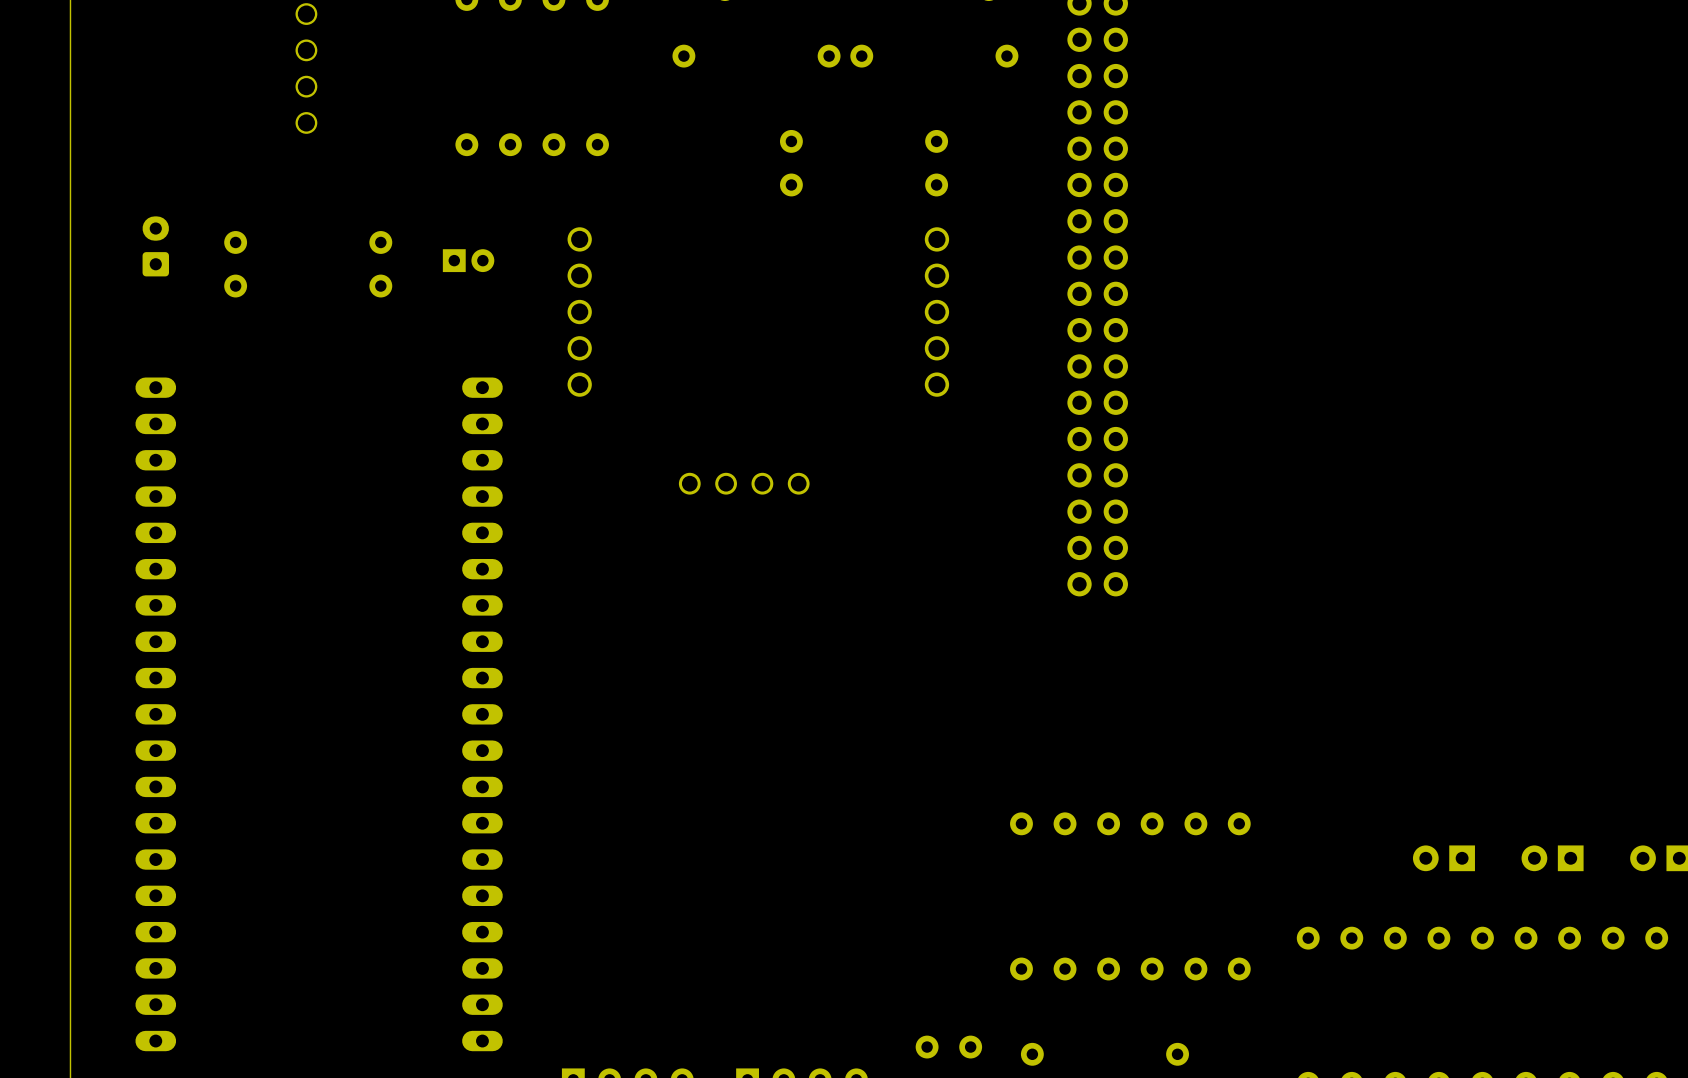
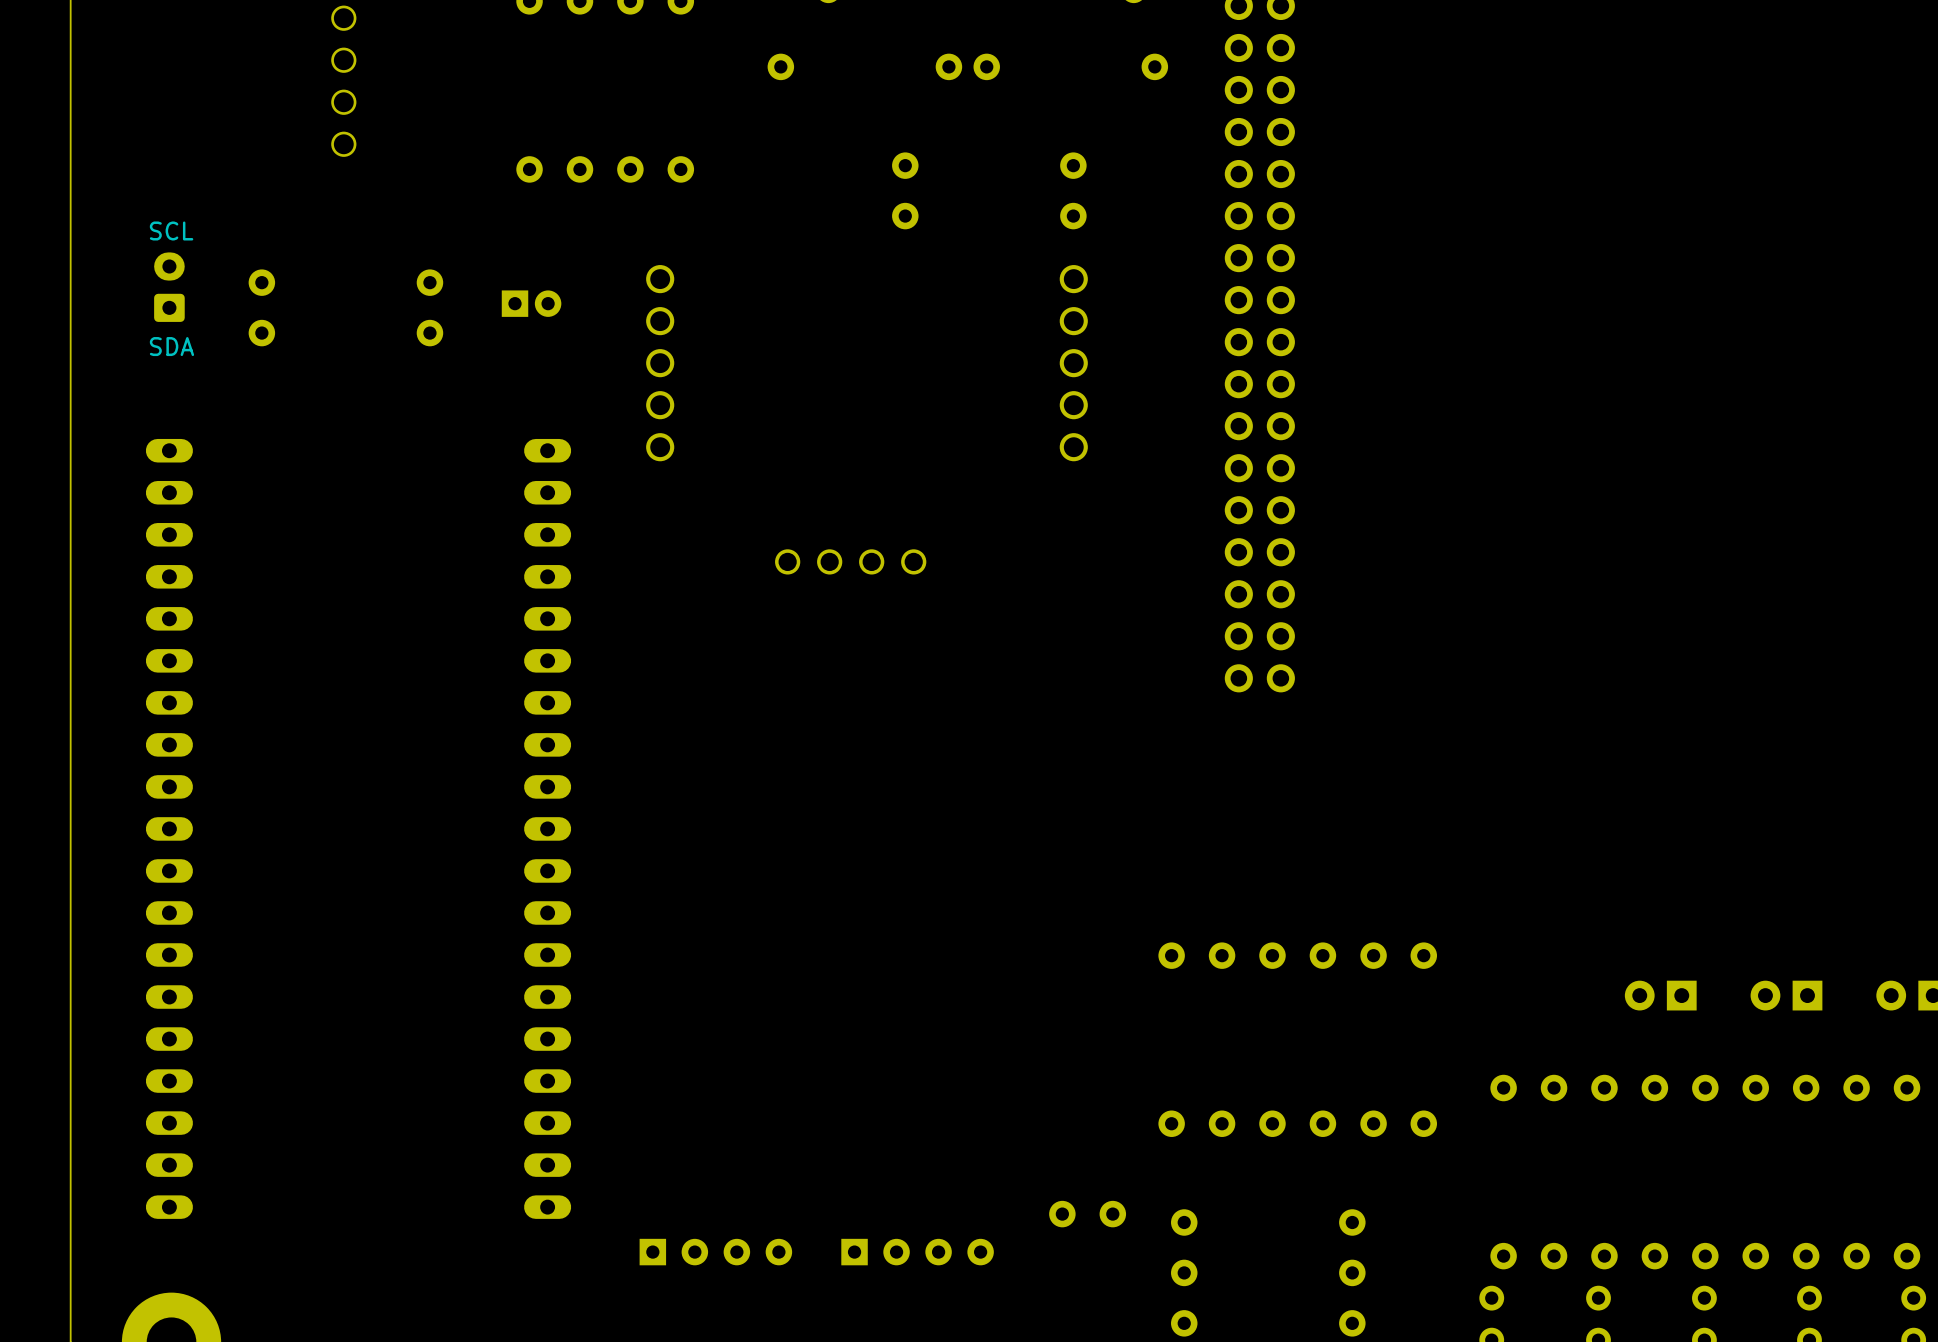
text: none -> SCL (171, 230)
text: none -> SDA (171, 346)

